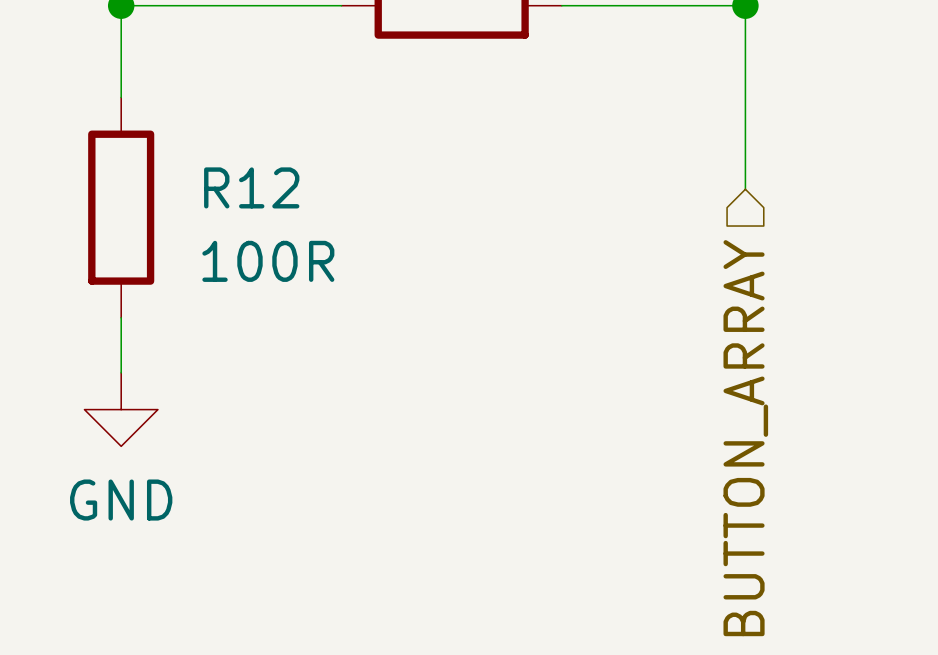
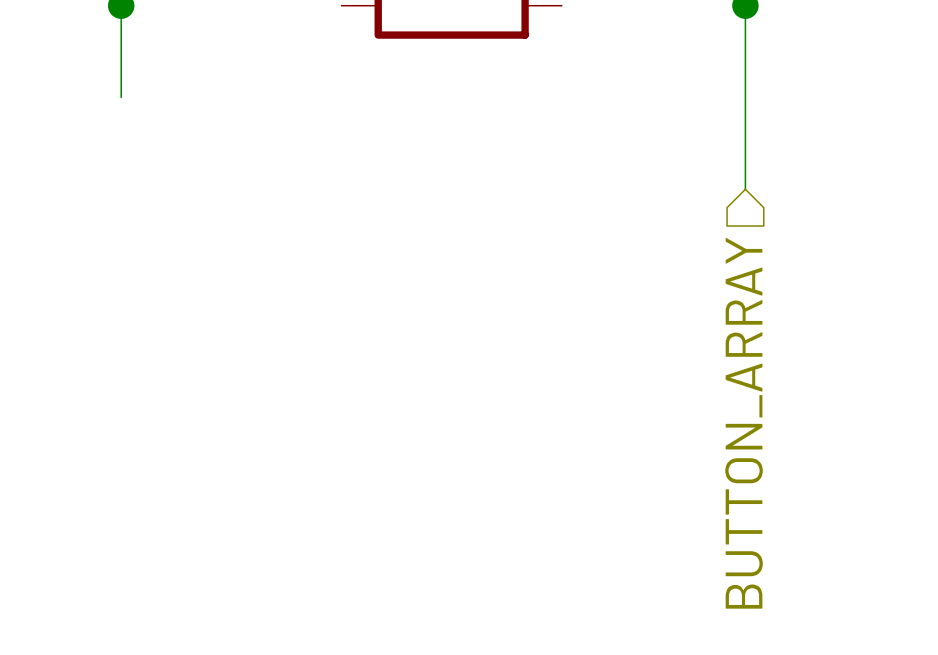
wire: (121, 5) (341, 5) -> none
wire: (561, 5) (745, 5) -> none
R12: 100R (121, 207) -> none
wire: (121, 317) (121, 372) -> none
power symbol: GND (121, 409) -> none

